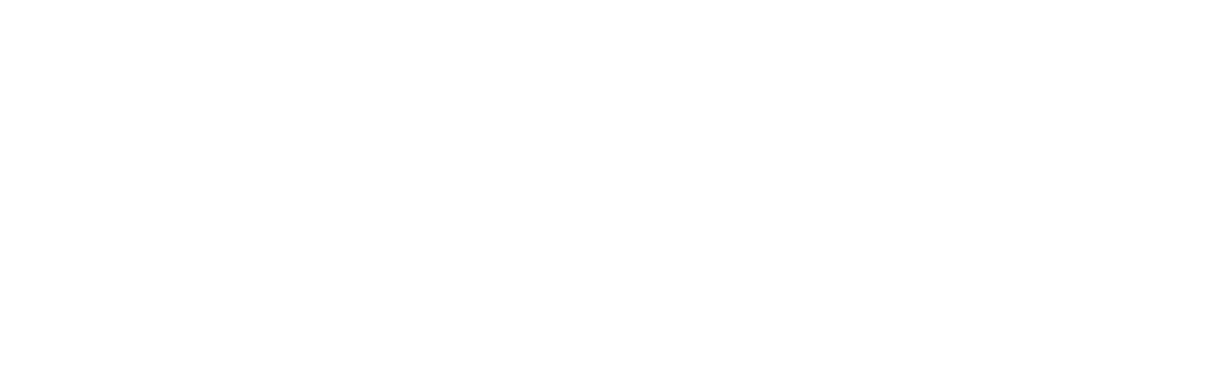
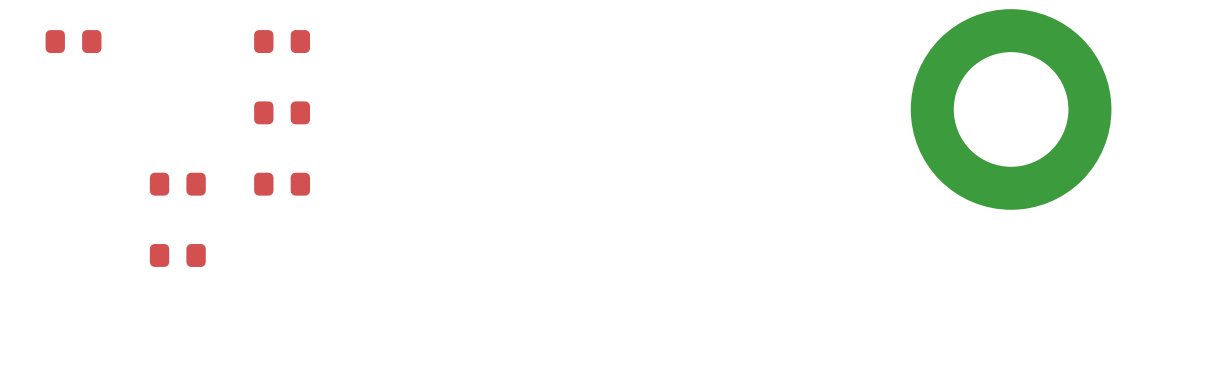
part: none -> (73, 41)
part: none -> (282, 41)
part: none -> (1011, 109)
part: none -> (282, 112)
part: none -> (177, 184)
part: none -> (282, 184)
part: none -> (177, 255)

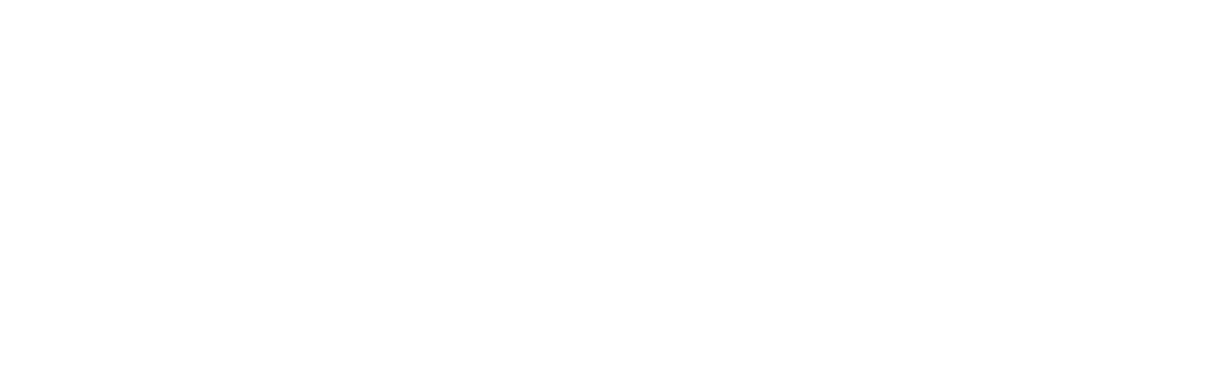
part: (73, 41) -> none
part: (282, 41) -> none
part: (1011, 109) -> none
part: (282, 112) -> none
part: (177, 184) -> none
part: (282, 184) -> none
part: (177, 255) -> none

